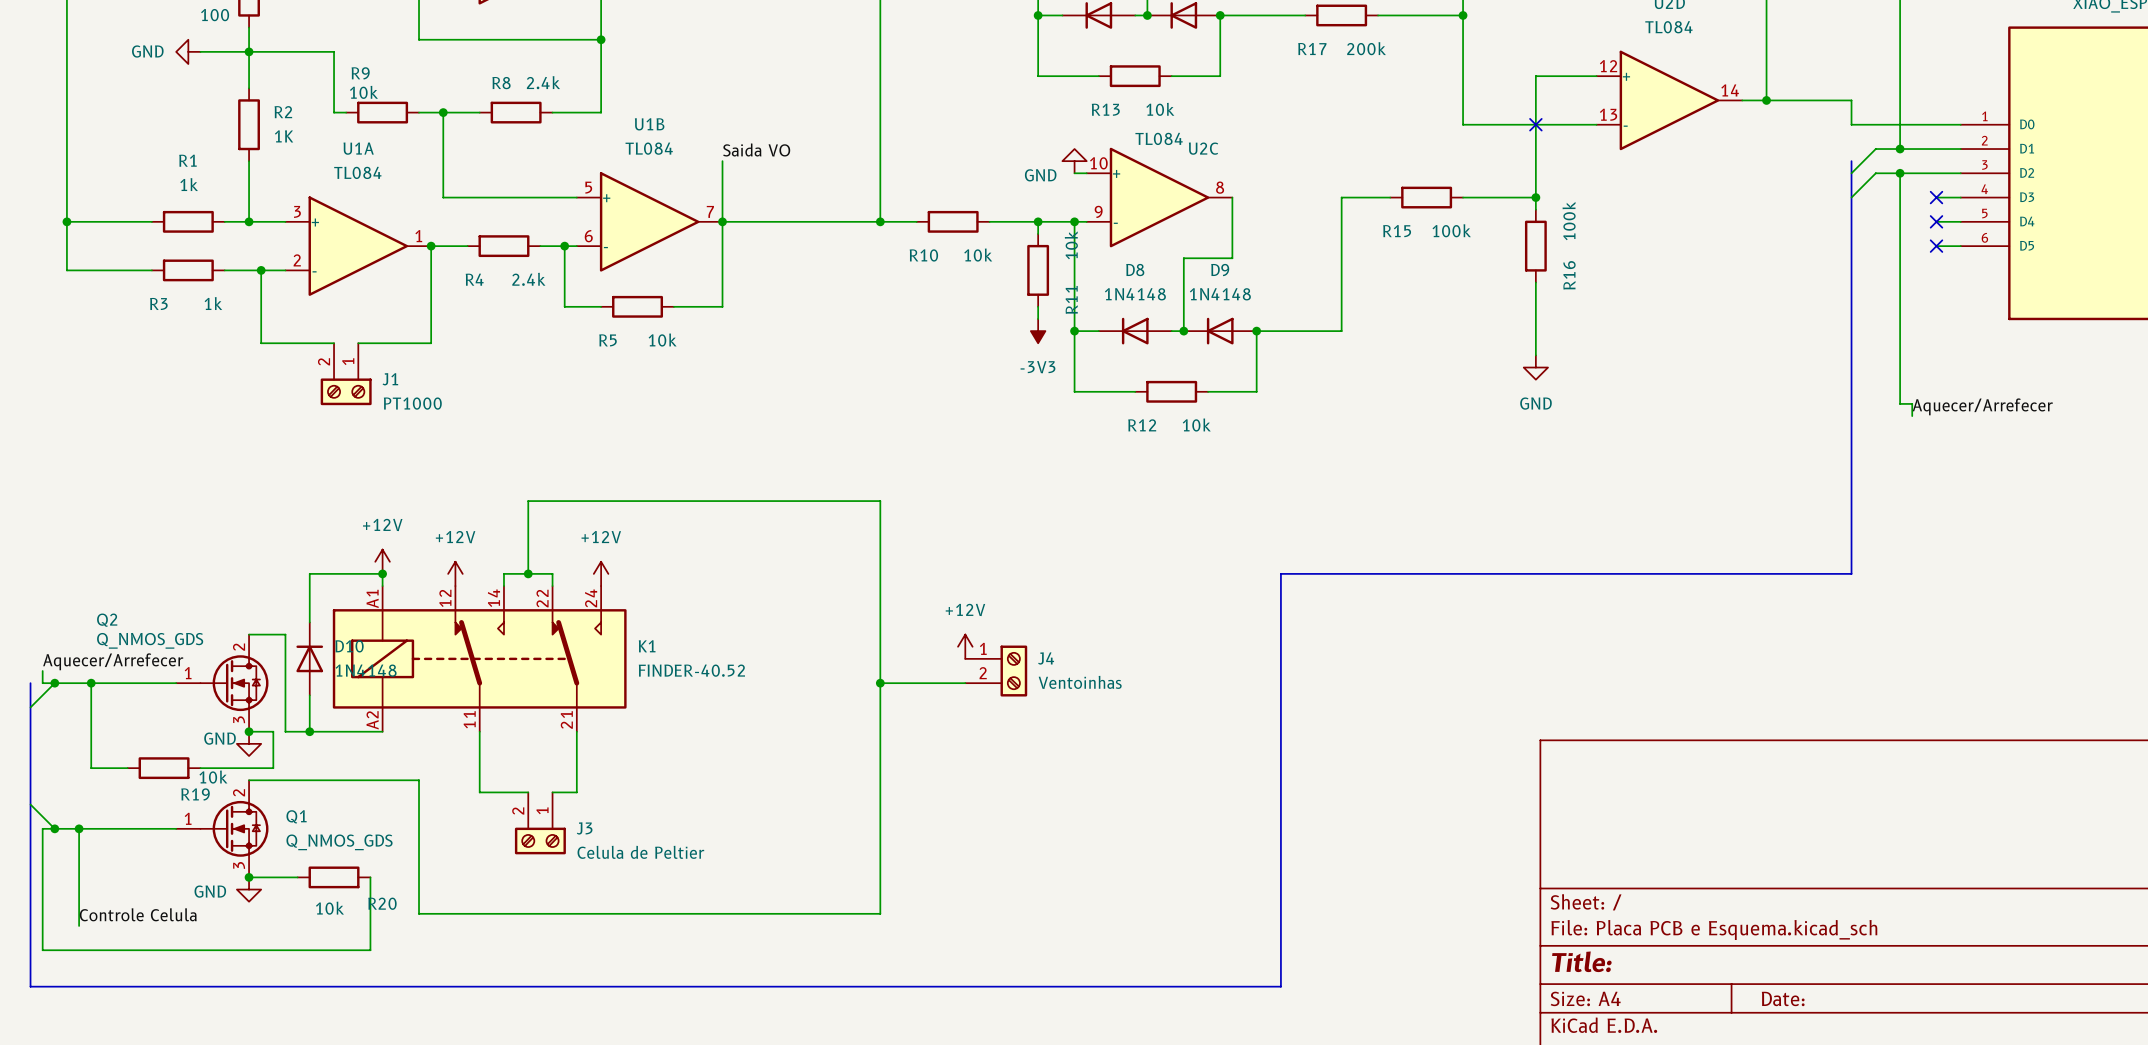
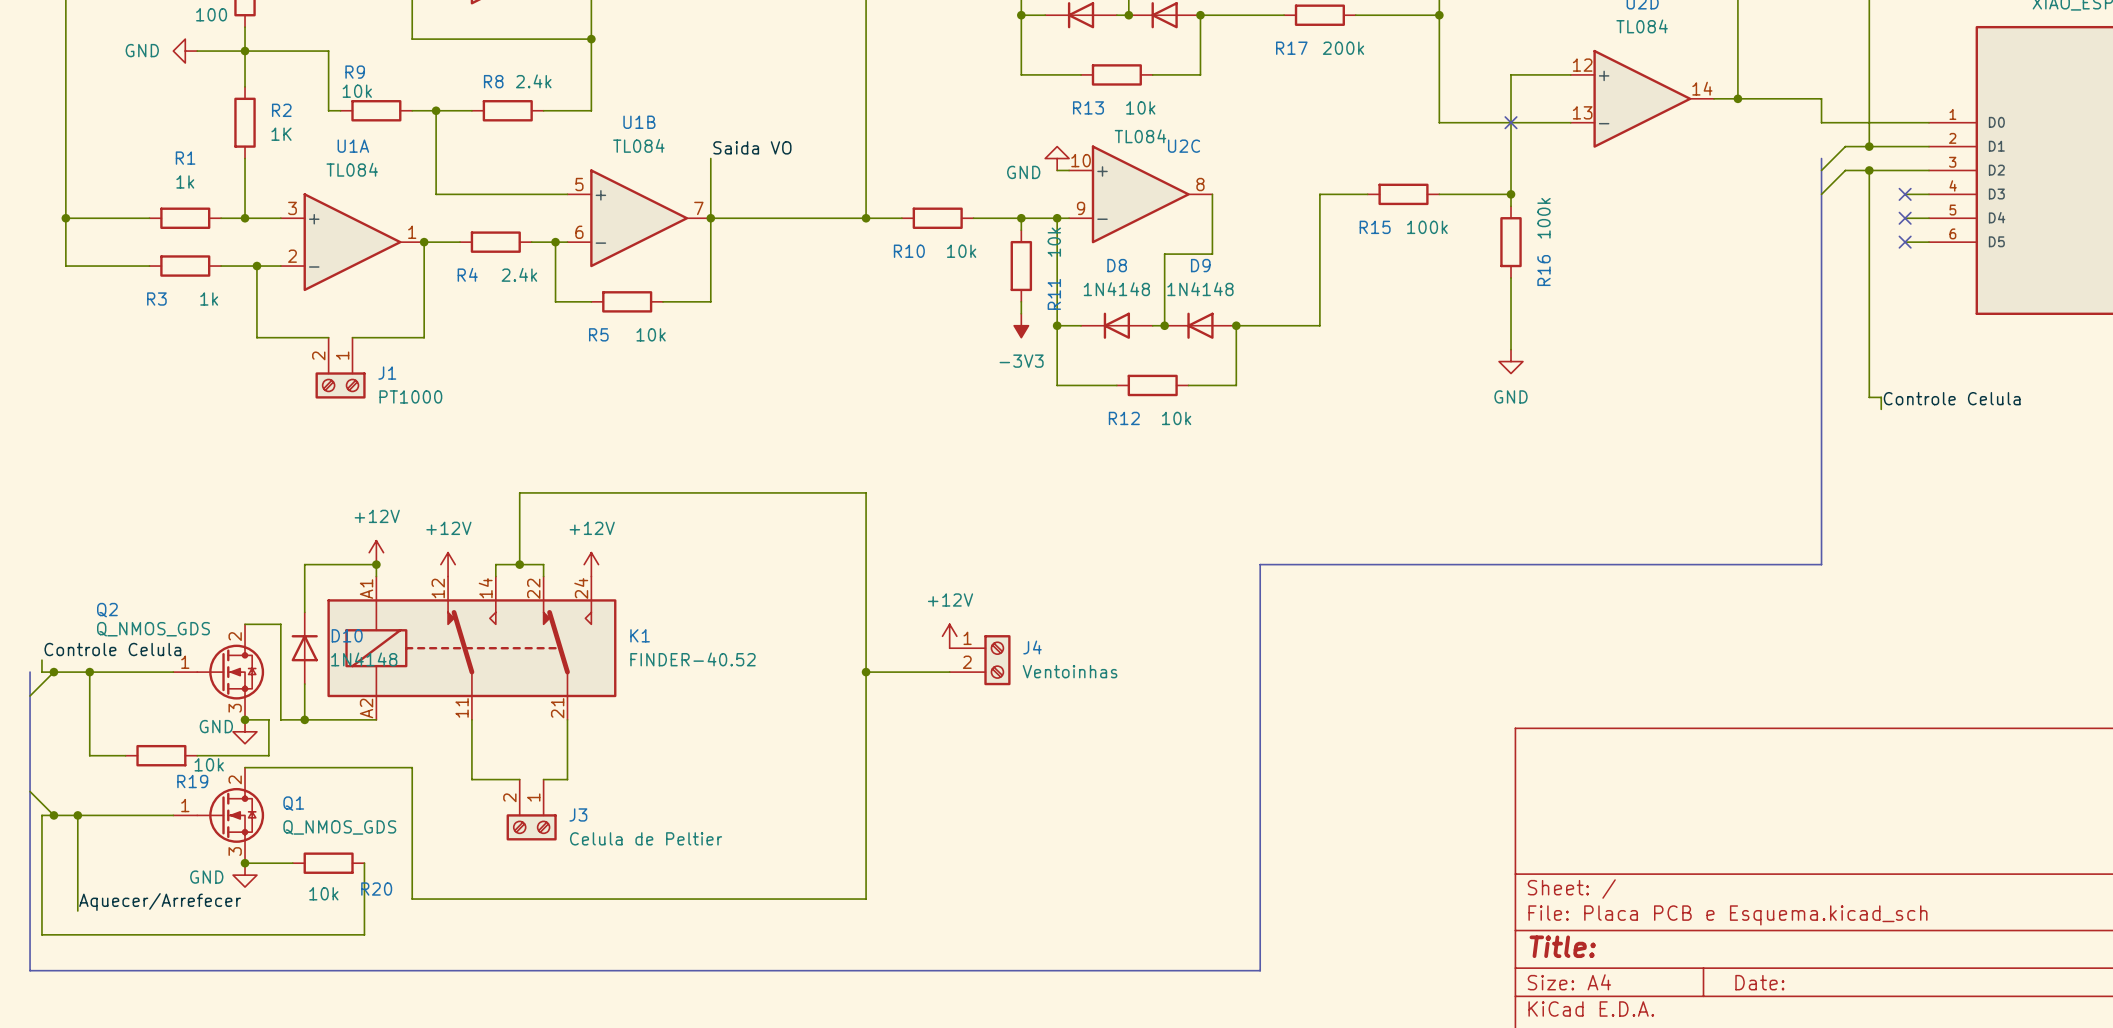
label: Aquecer/Arrefecer (1982, 406) -> Controle Celula (1952, 398)
label: Aquecer/Arrefecer (113, 661) -> Controle Celula (112, 649)
label: Controle Celula (138, 914) -> Aquecer/Arrefecer (160, 902)

